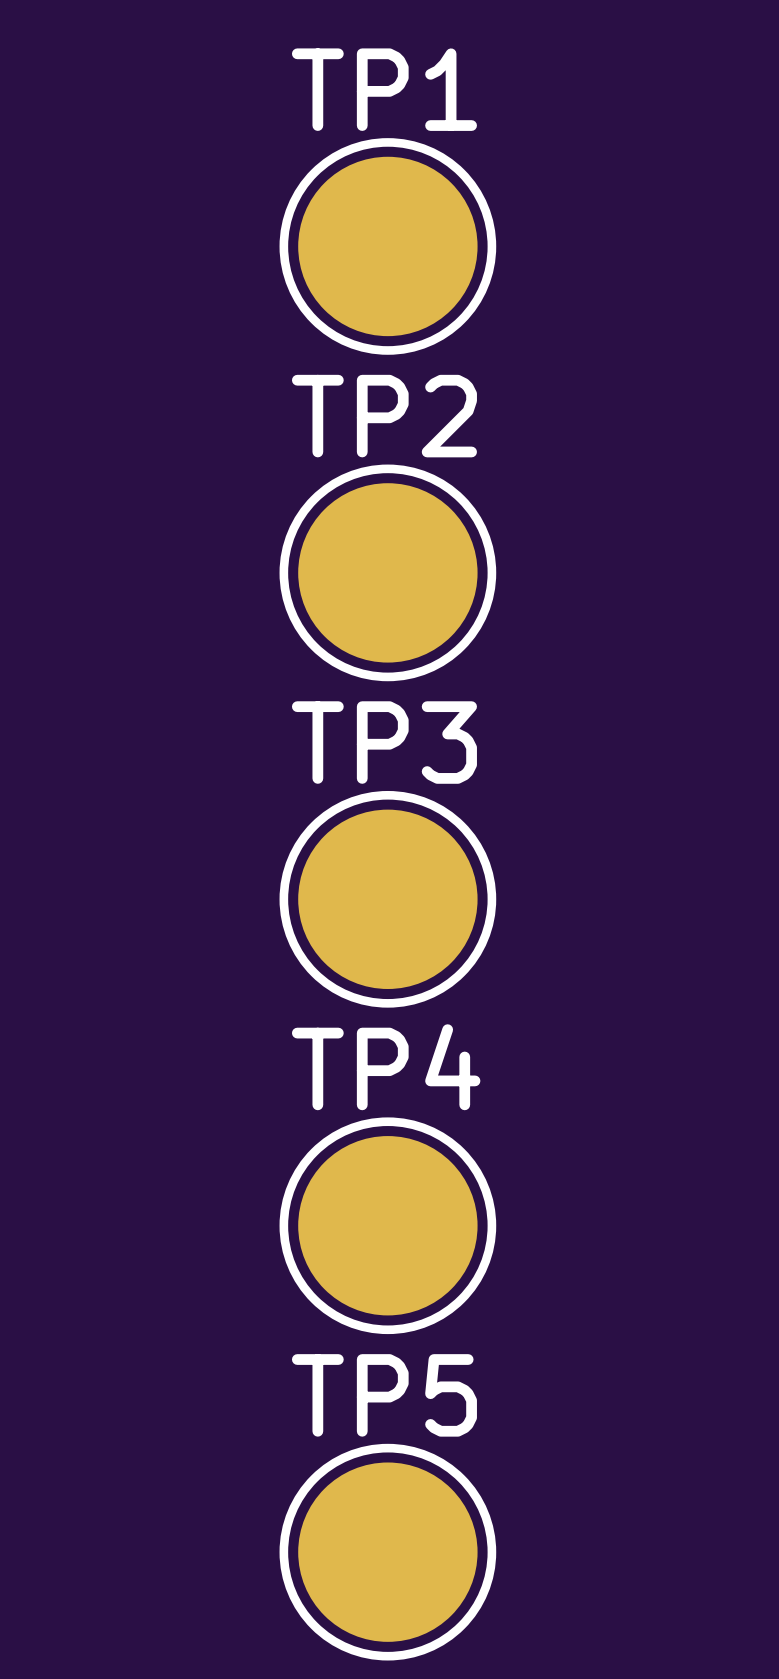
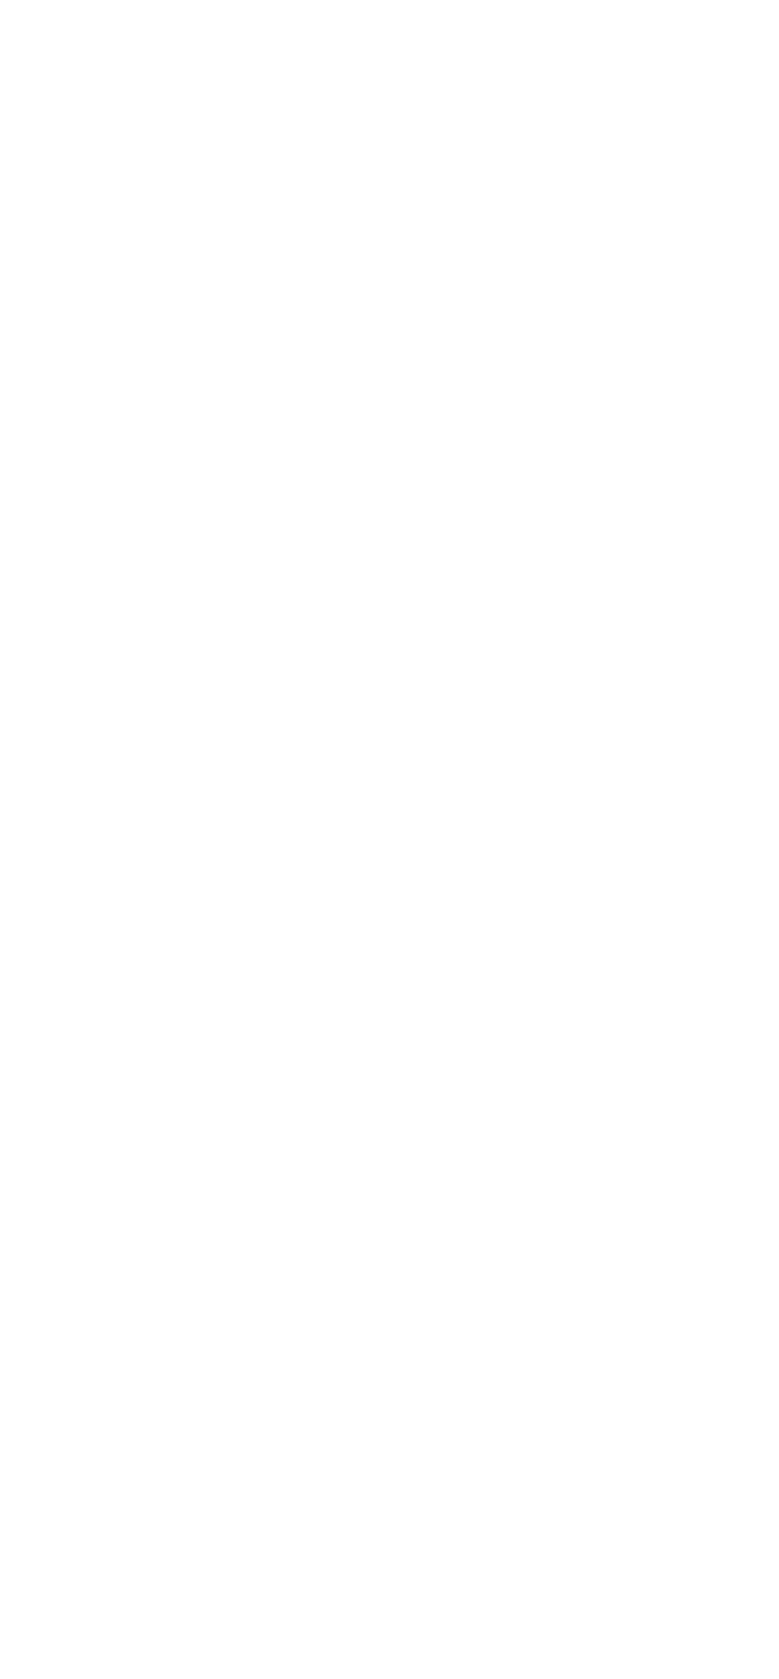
TP1: (387, 246) -> none
TP2: (387, 572) -> none
TP3: (387, 899) -> none
TP4: (387, 1225) -> none
TP5: (387, 1552) -> none

